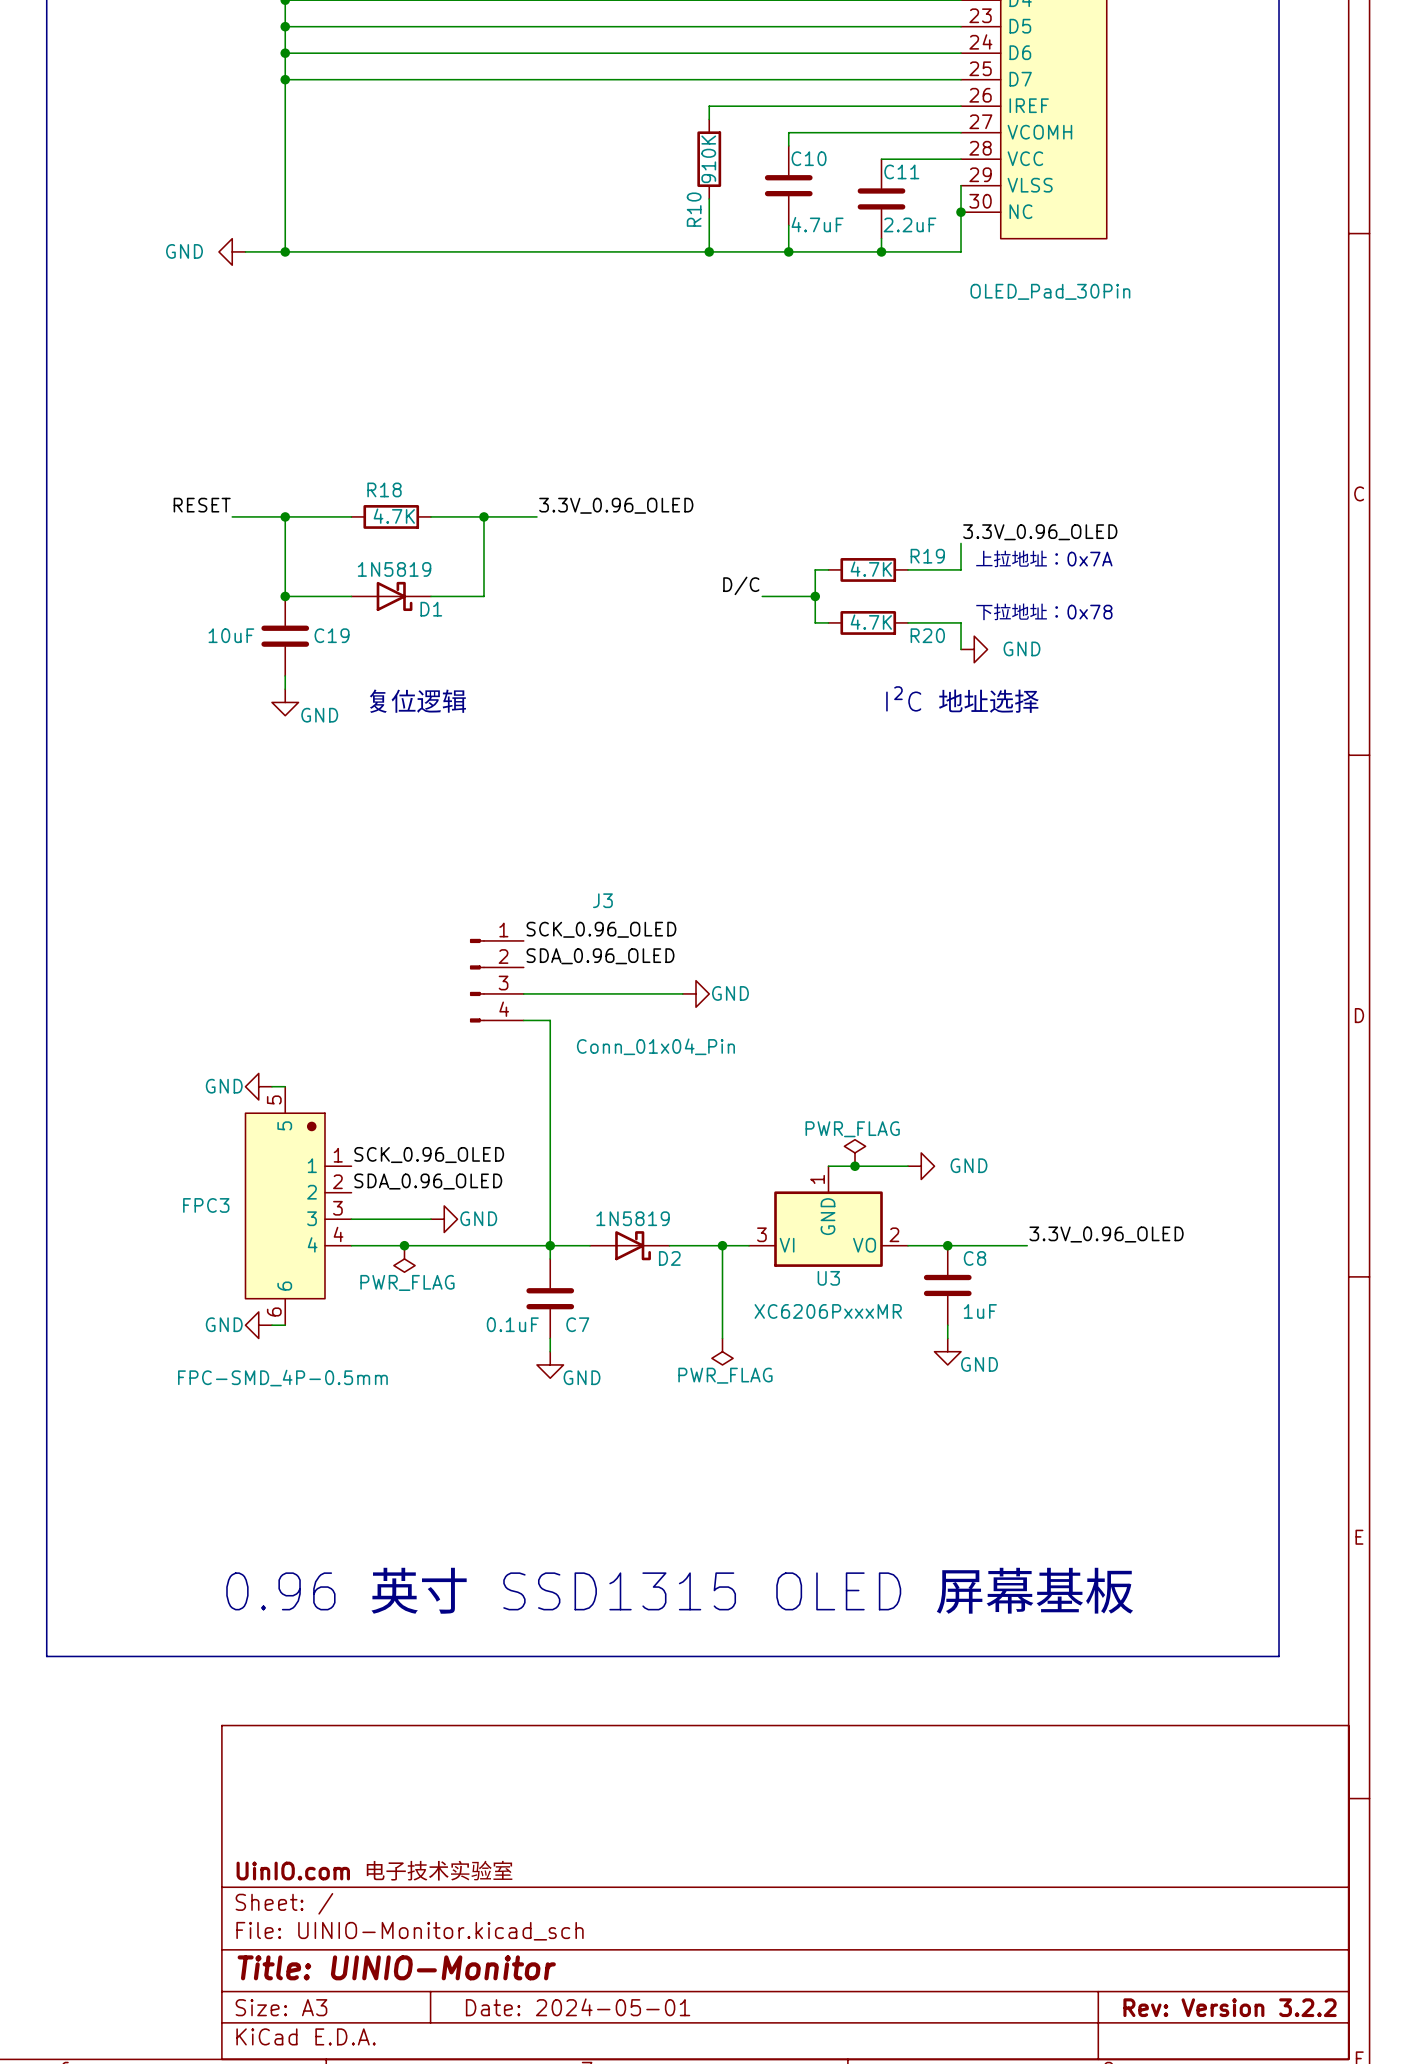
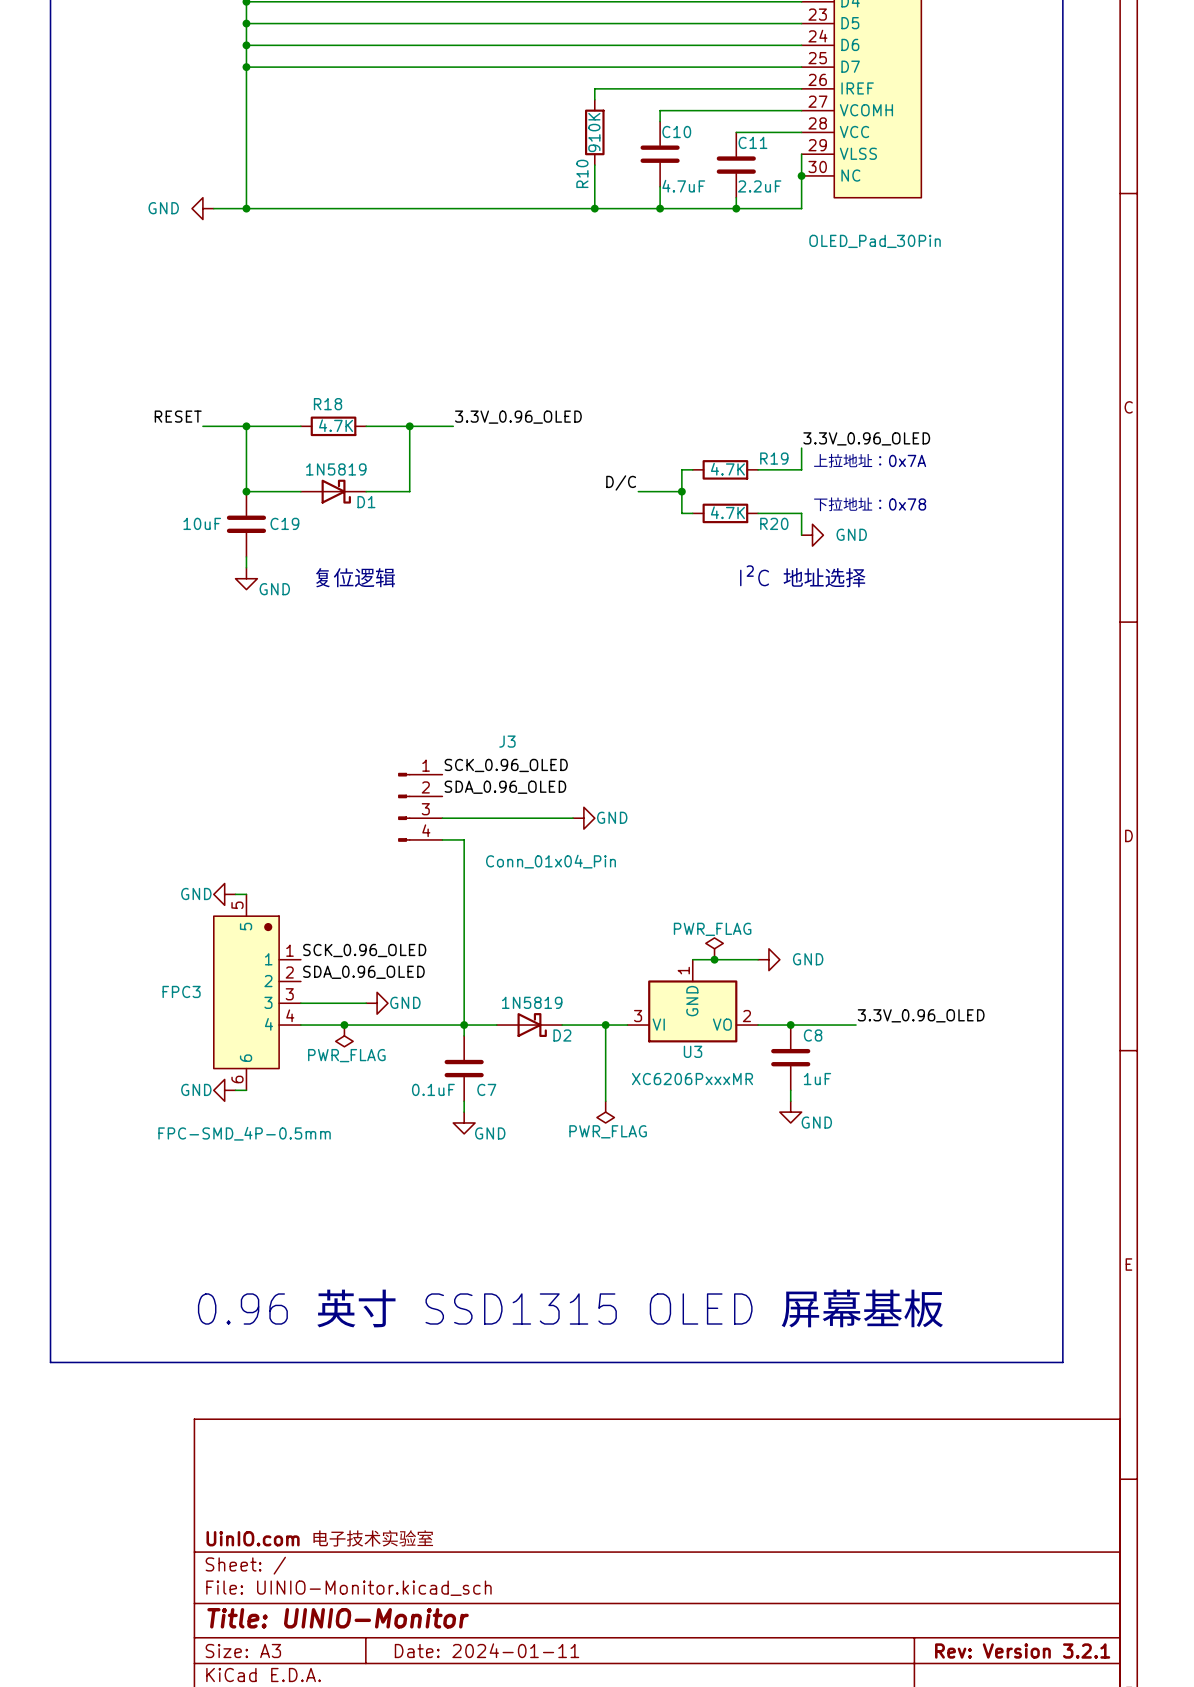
title block: Date: 2024-05-01 (578, 2007) -> Date: 2024-01-11 (487, 1650)
title block: Rev: Version 3.2.2 (1230, 2007) -> Rev: Version 3.2.1 (1022, 1651)

